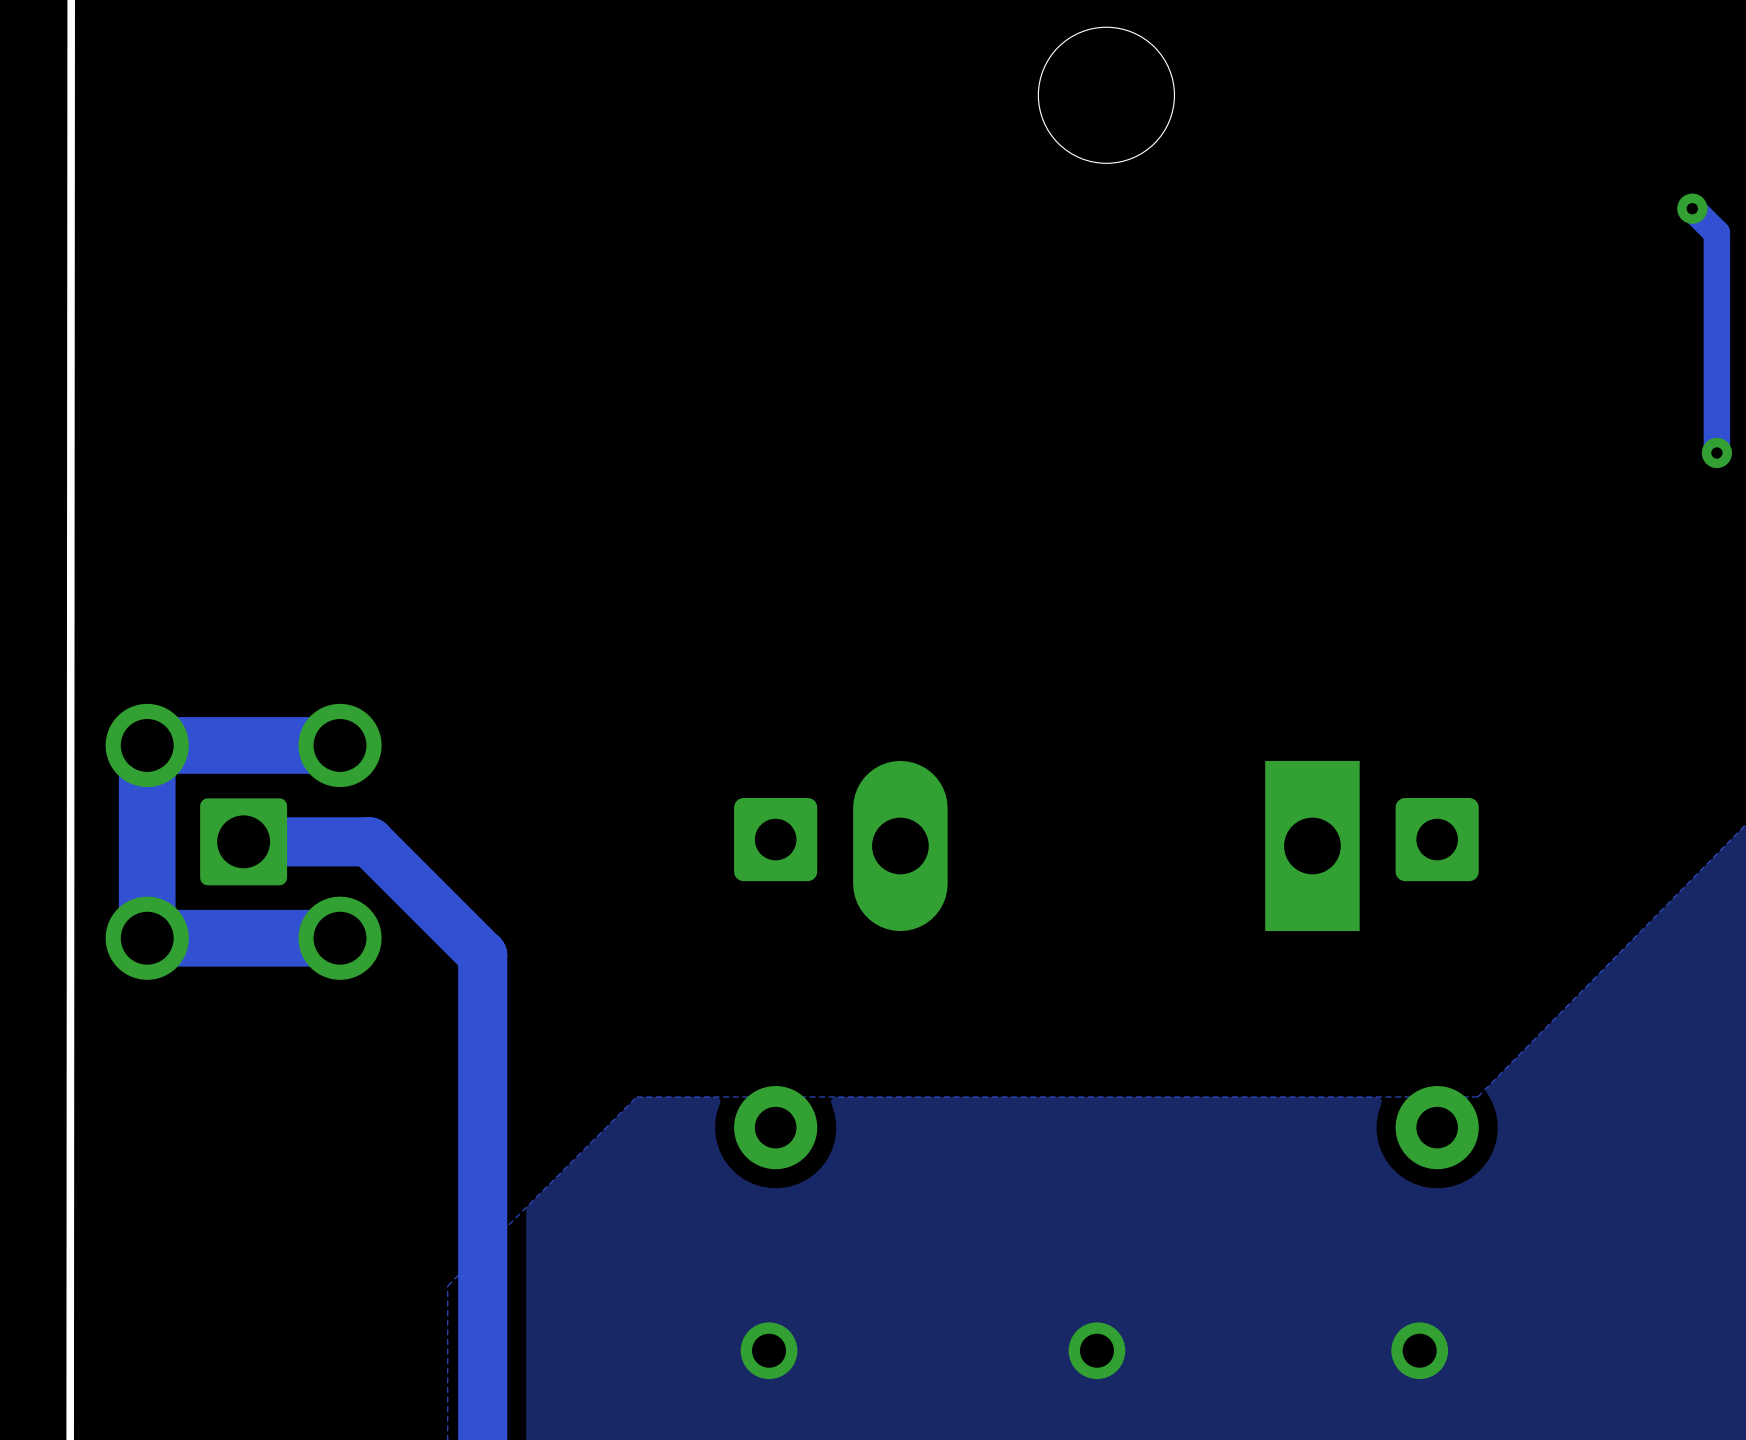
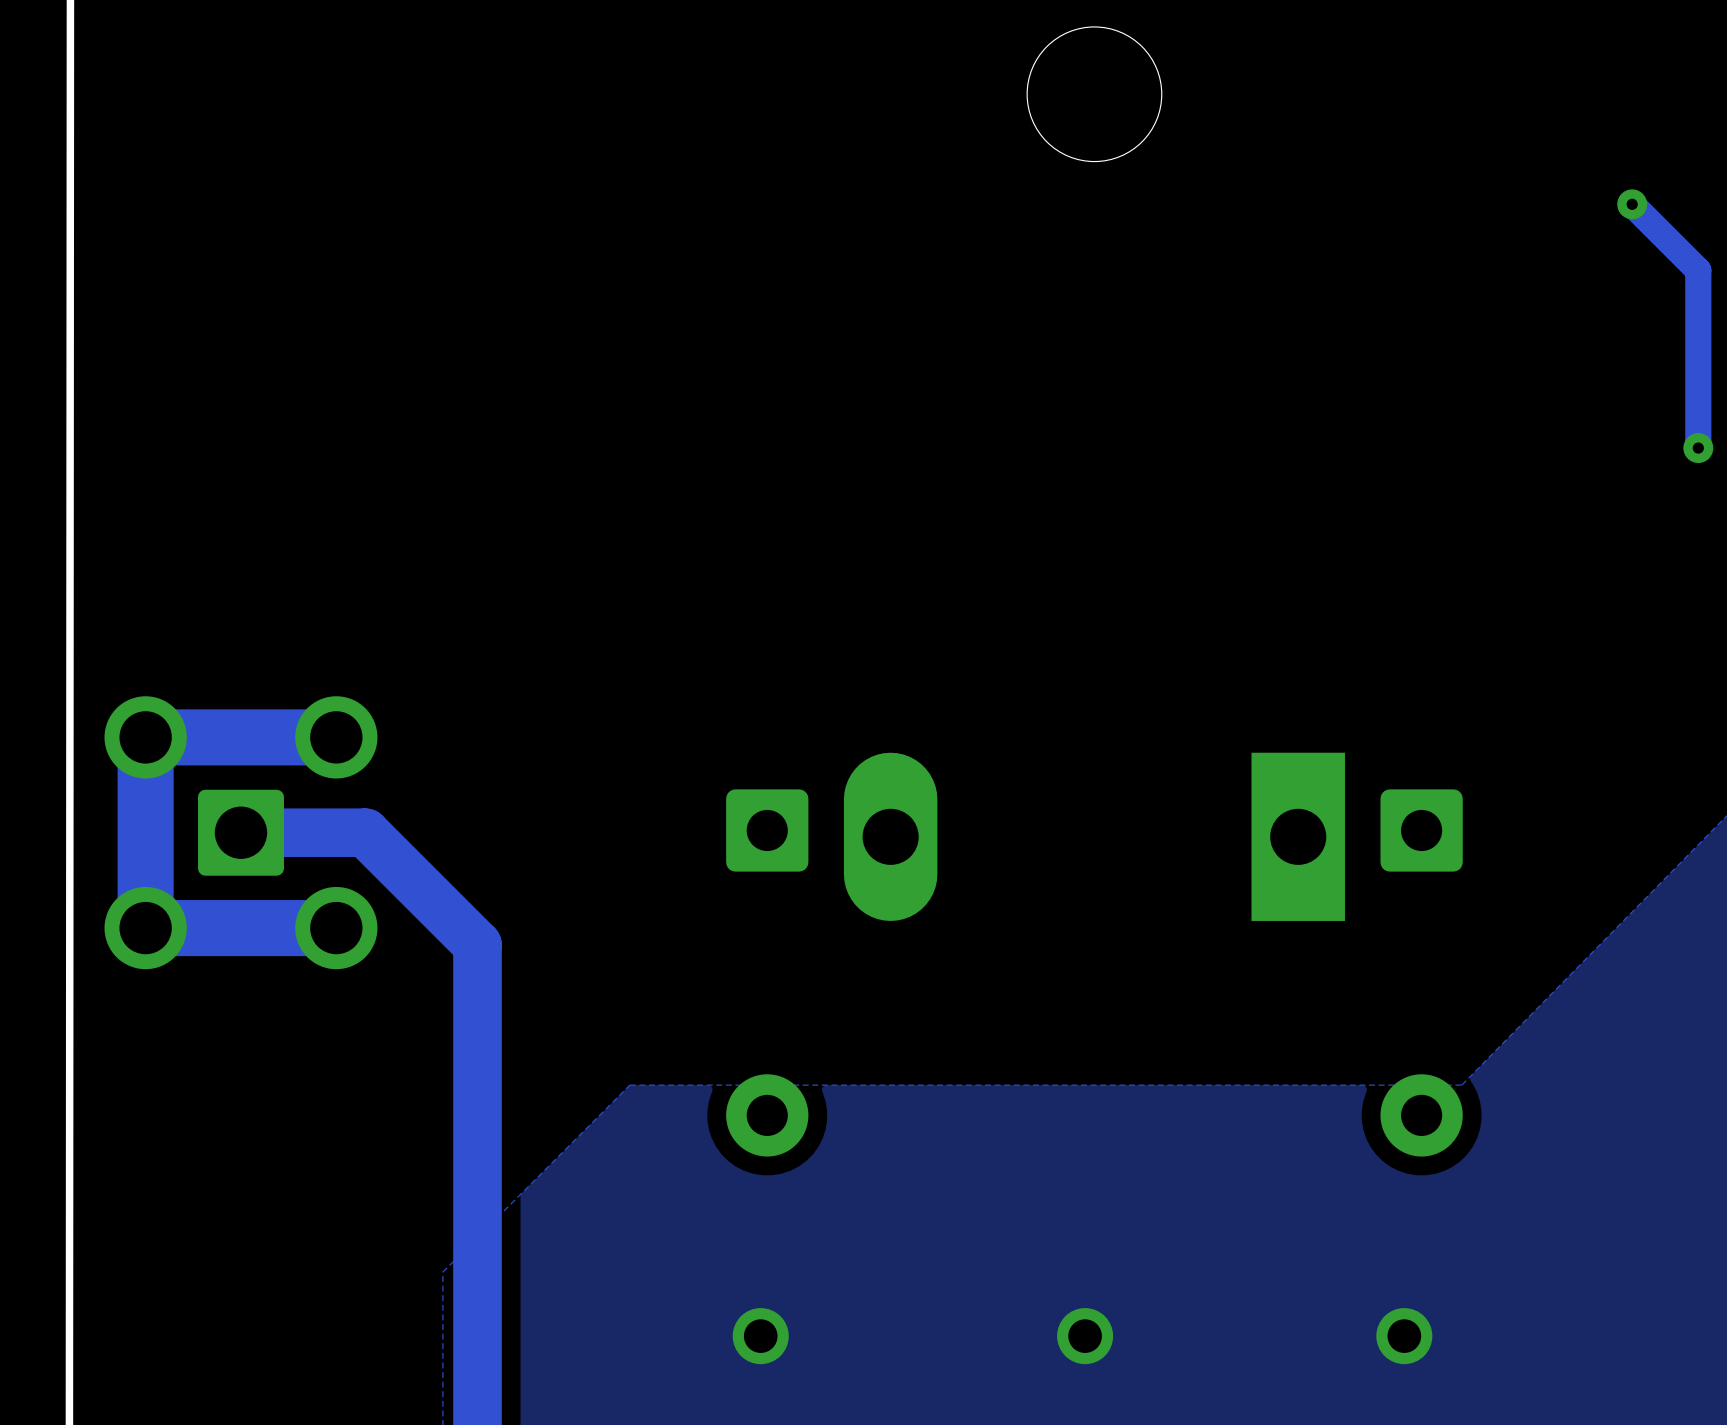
track: (1692, 208) (1716, 233) (1716, 273) -> (1632, 204) (1698, 270)
via position: (1692, 208) -> (1632, 204)

